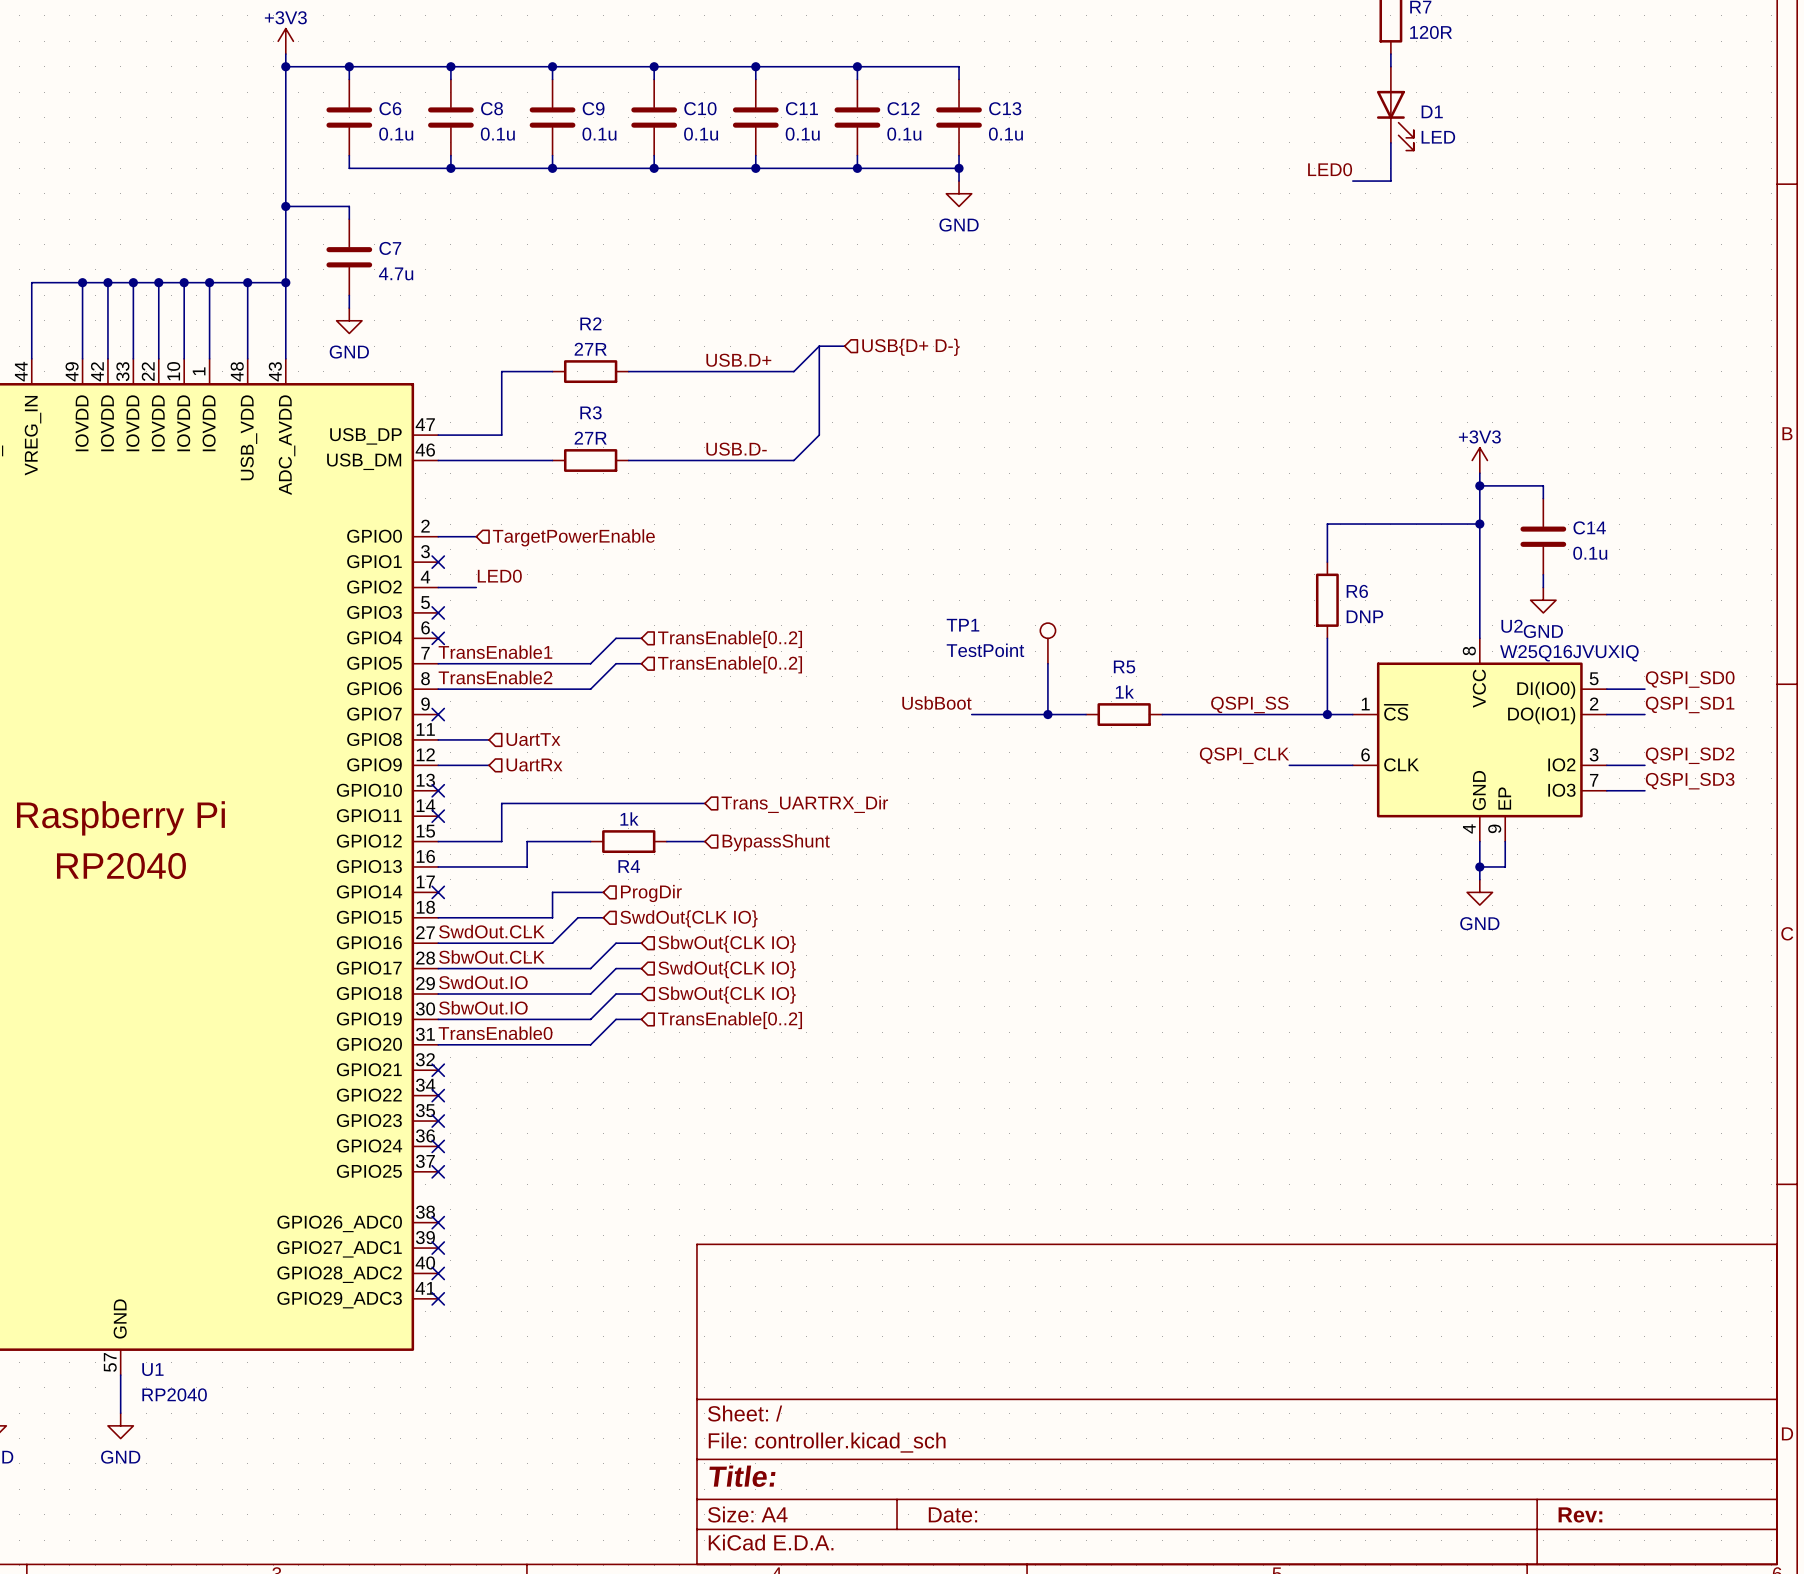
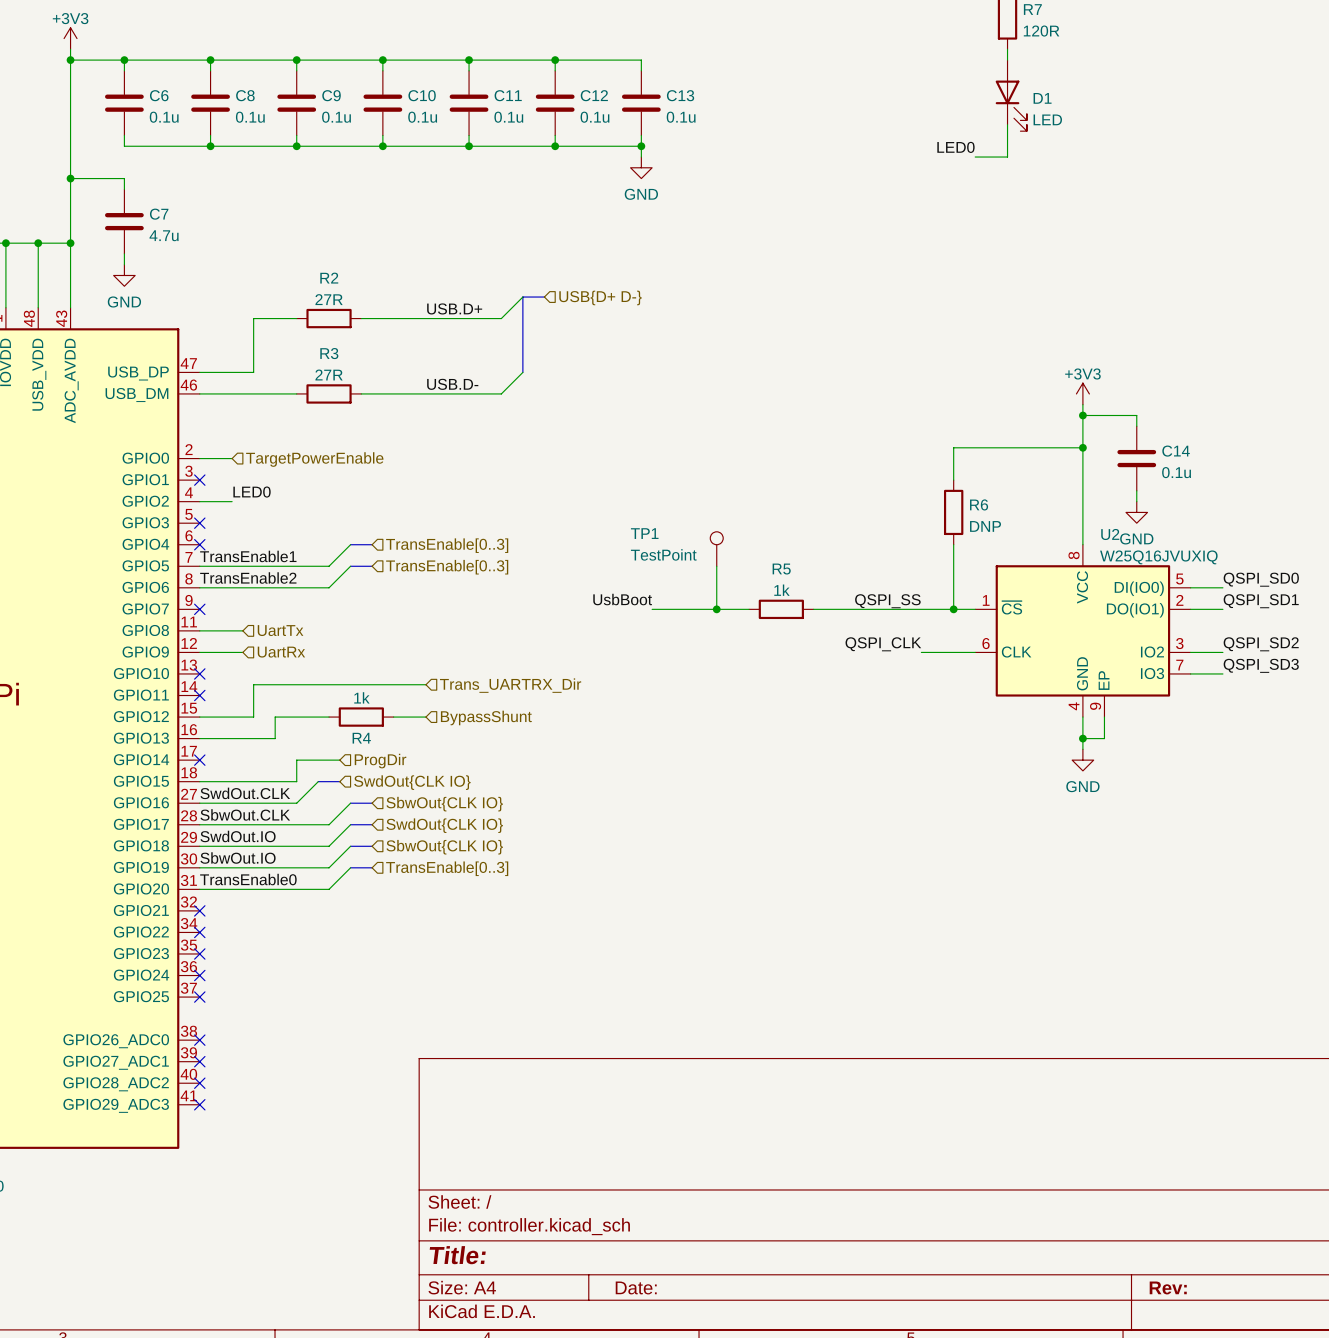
hierarchical label: TransEnable[0..2] (730, 639) -> TransEnable[0..3] (447, 545)
hierarchical label: TransEnable[0..2] (730, 664) -> TransEnable[0..3] (447, 567)
hierarchical label: TransEnable[0..2] (730, 1020) -> TransEnable[0..3] (447, 868)

